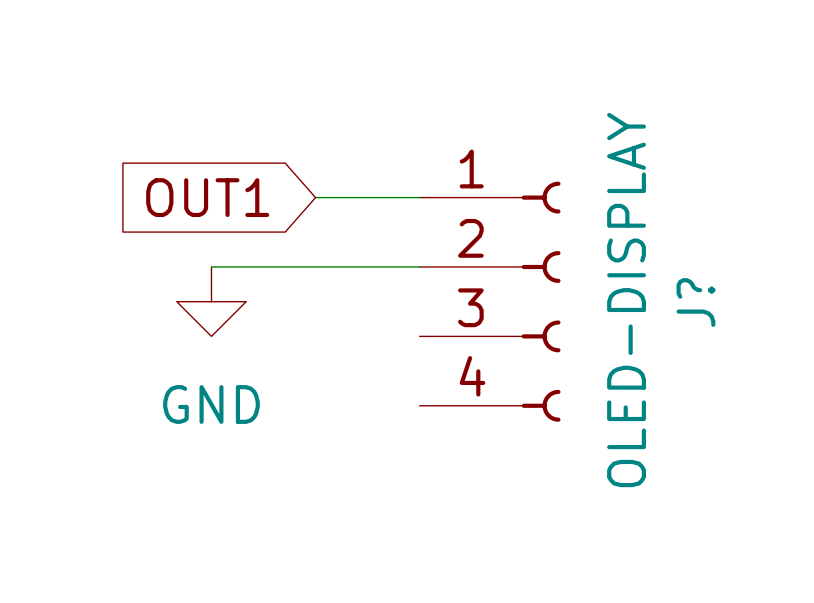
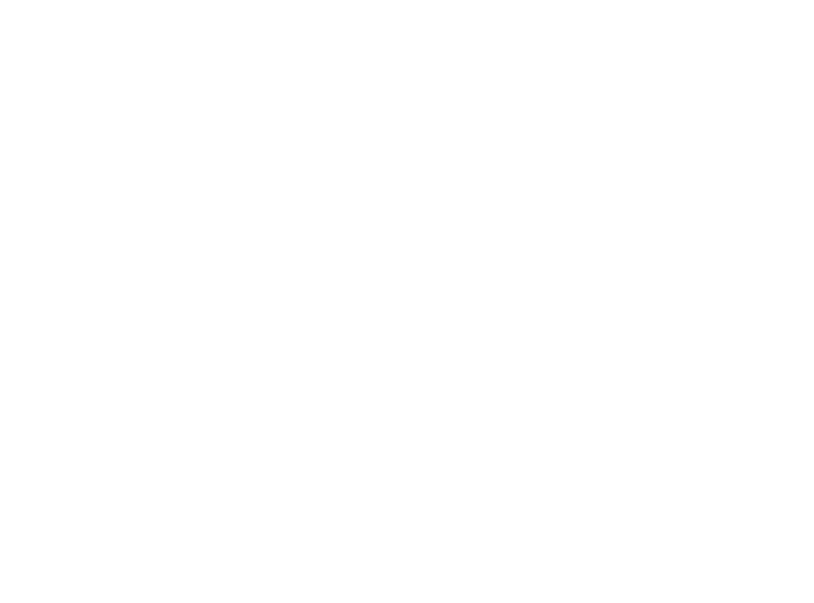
global label: OUT1 (207, 197) -> none
wire: (315, 197) (419, 197) -> none
wire: (211, 266) (419, 266) -> none
power symbol: GND (211, 301) -> none
J?: OLED-DISPLAY (490, 301) -> none

